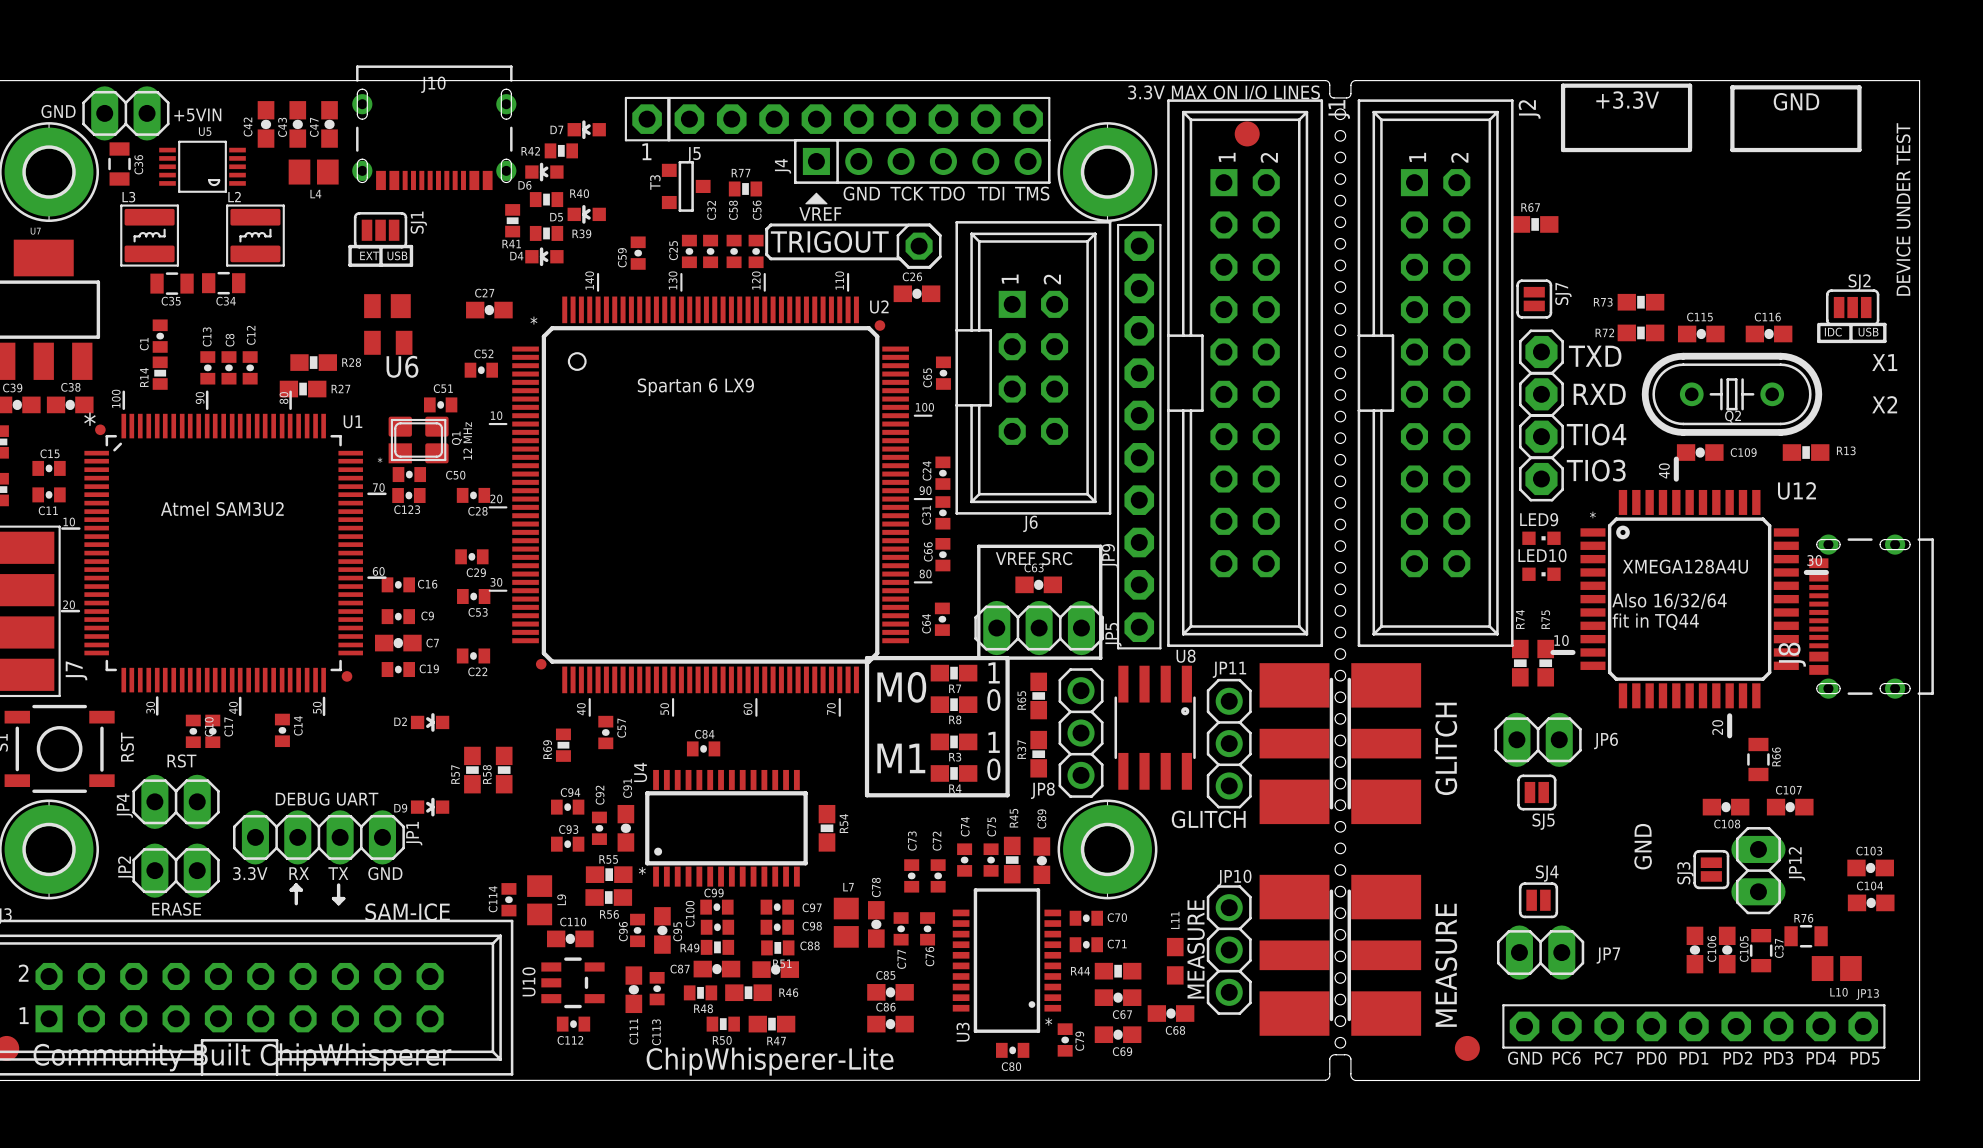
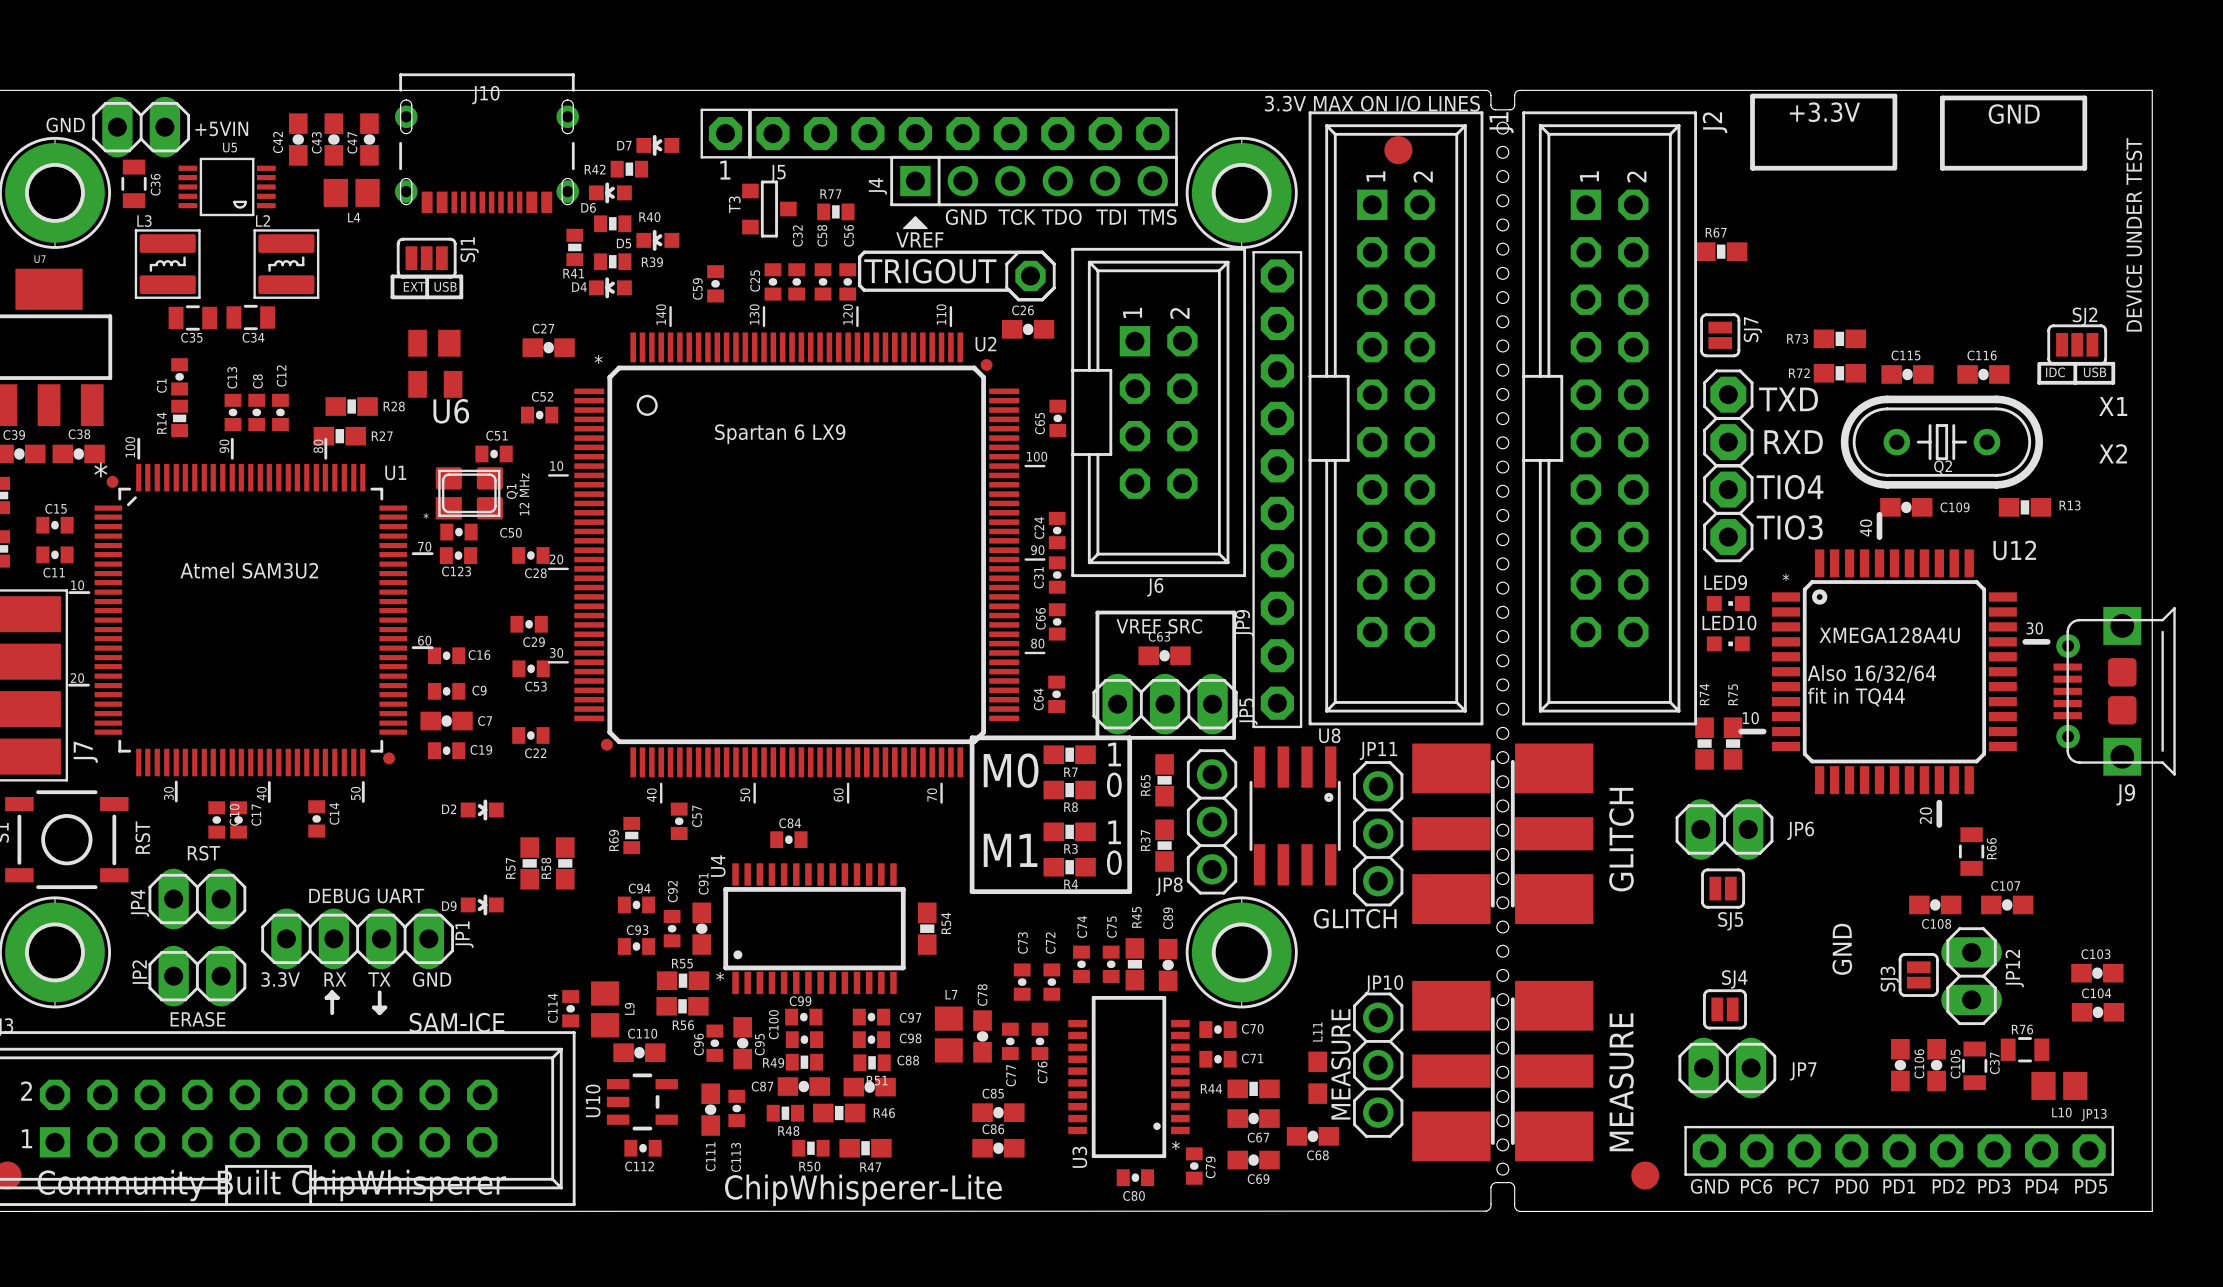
J8: (1871, 616) -> none
J9: none -> (2114, 691)

